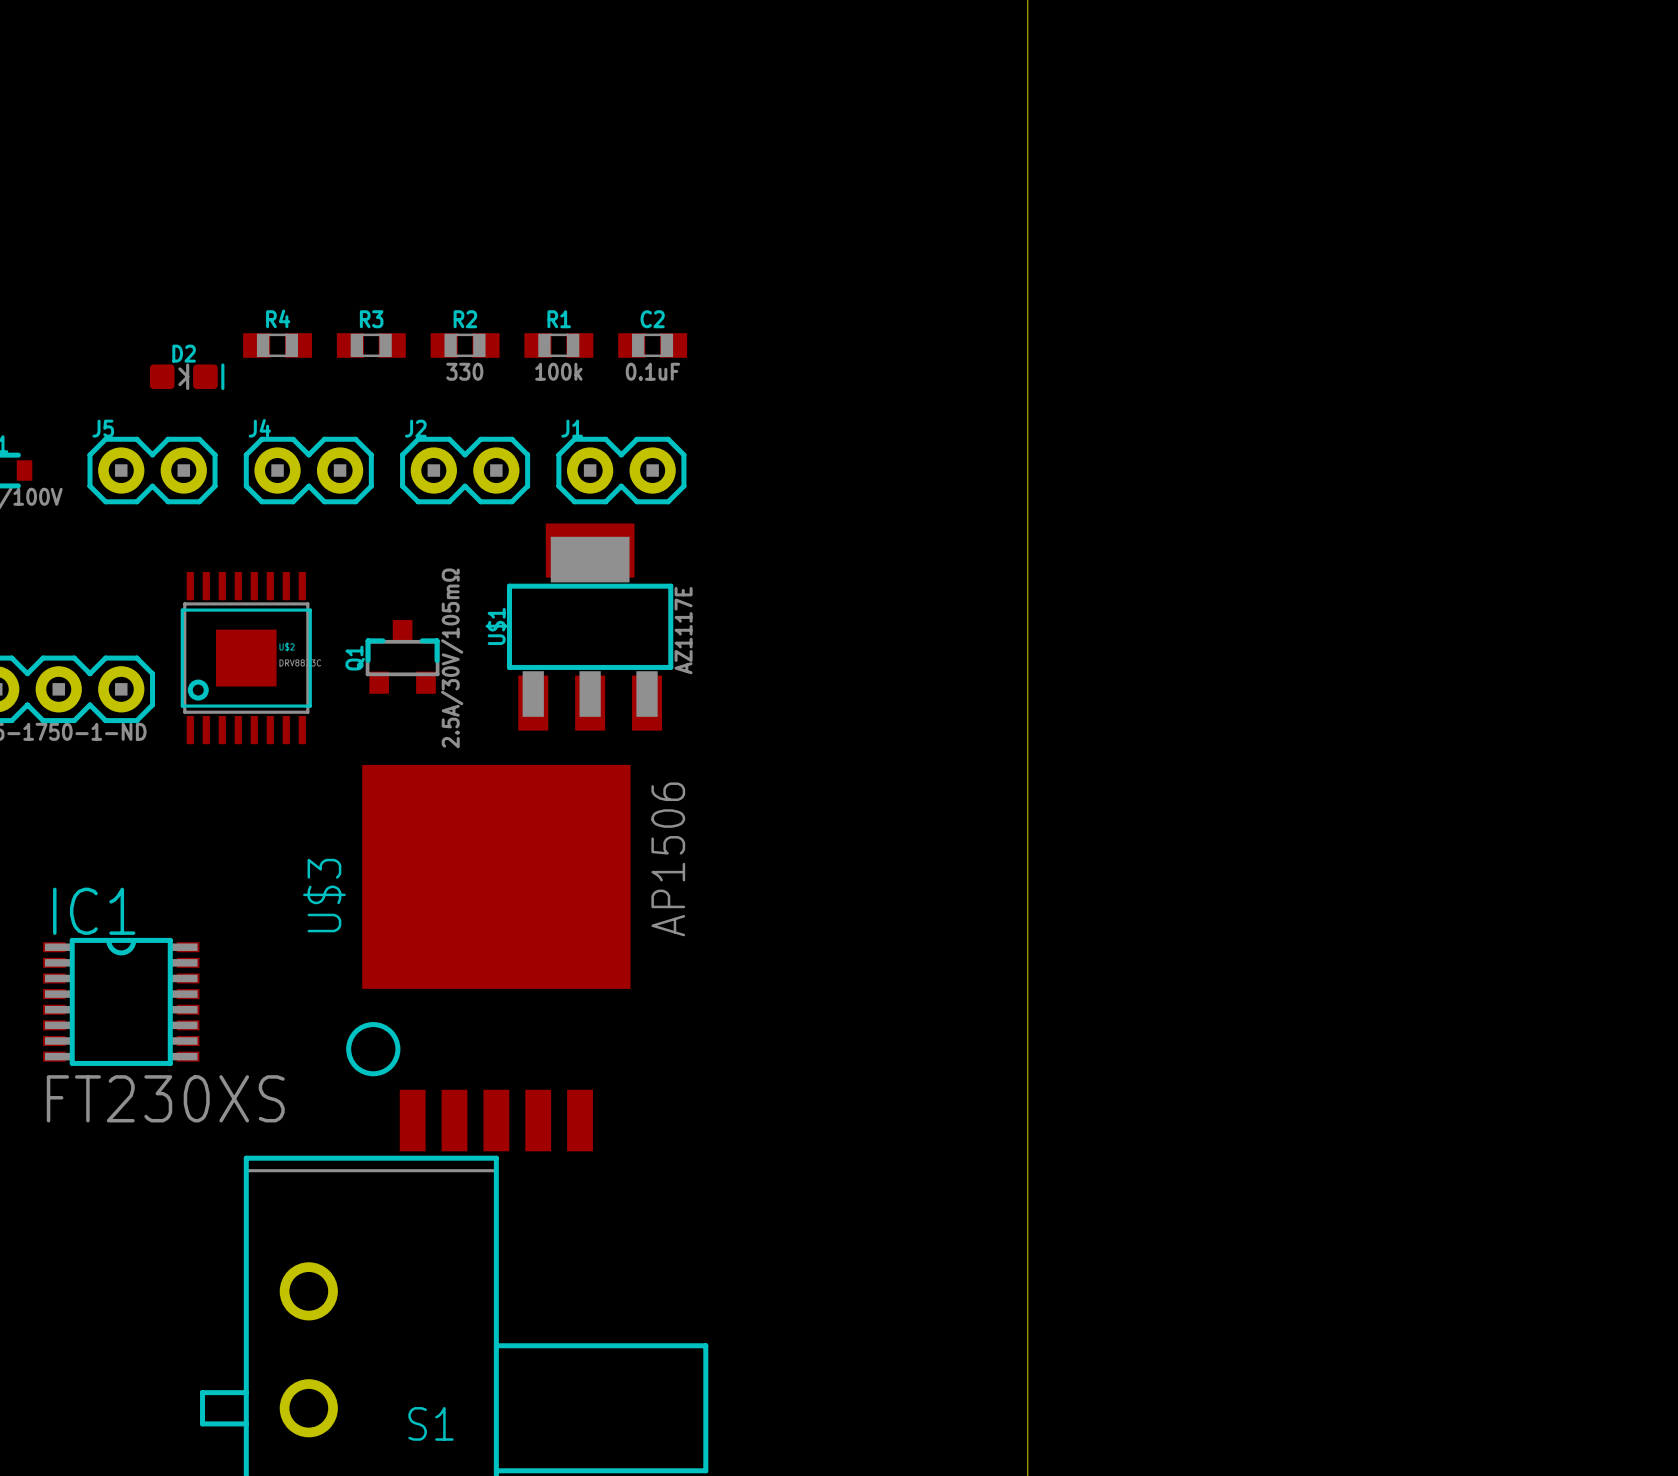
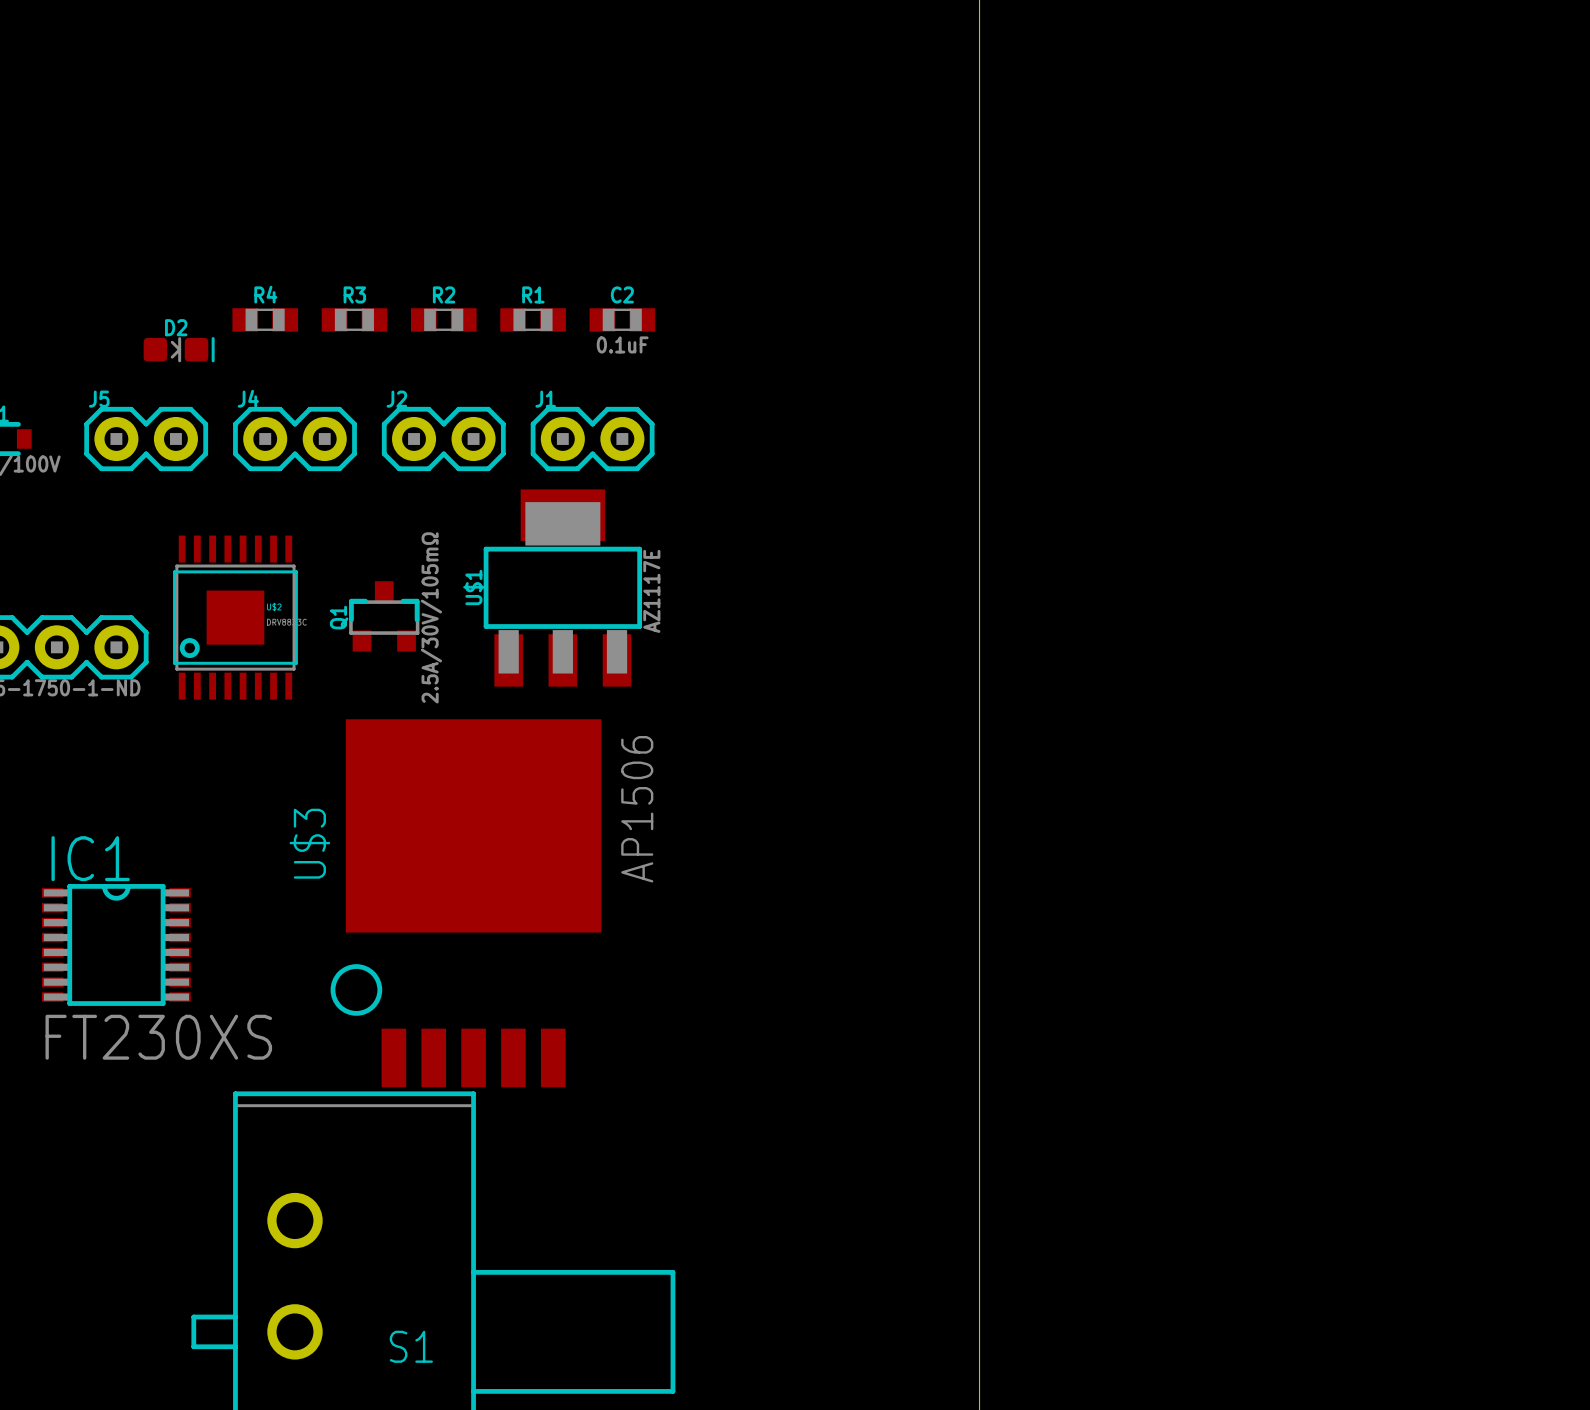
R2 value: 330 (464, 371) -> none
R1 value: 100k (558, 371) -> none

